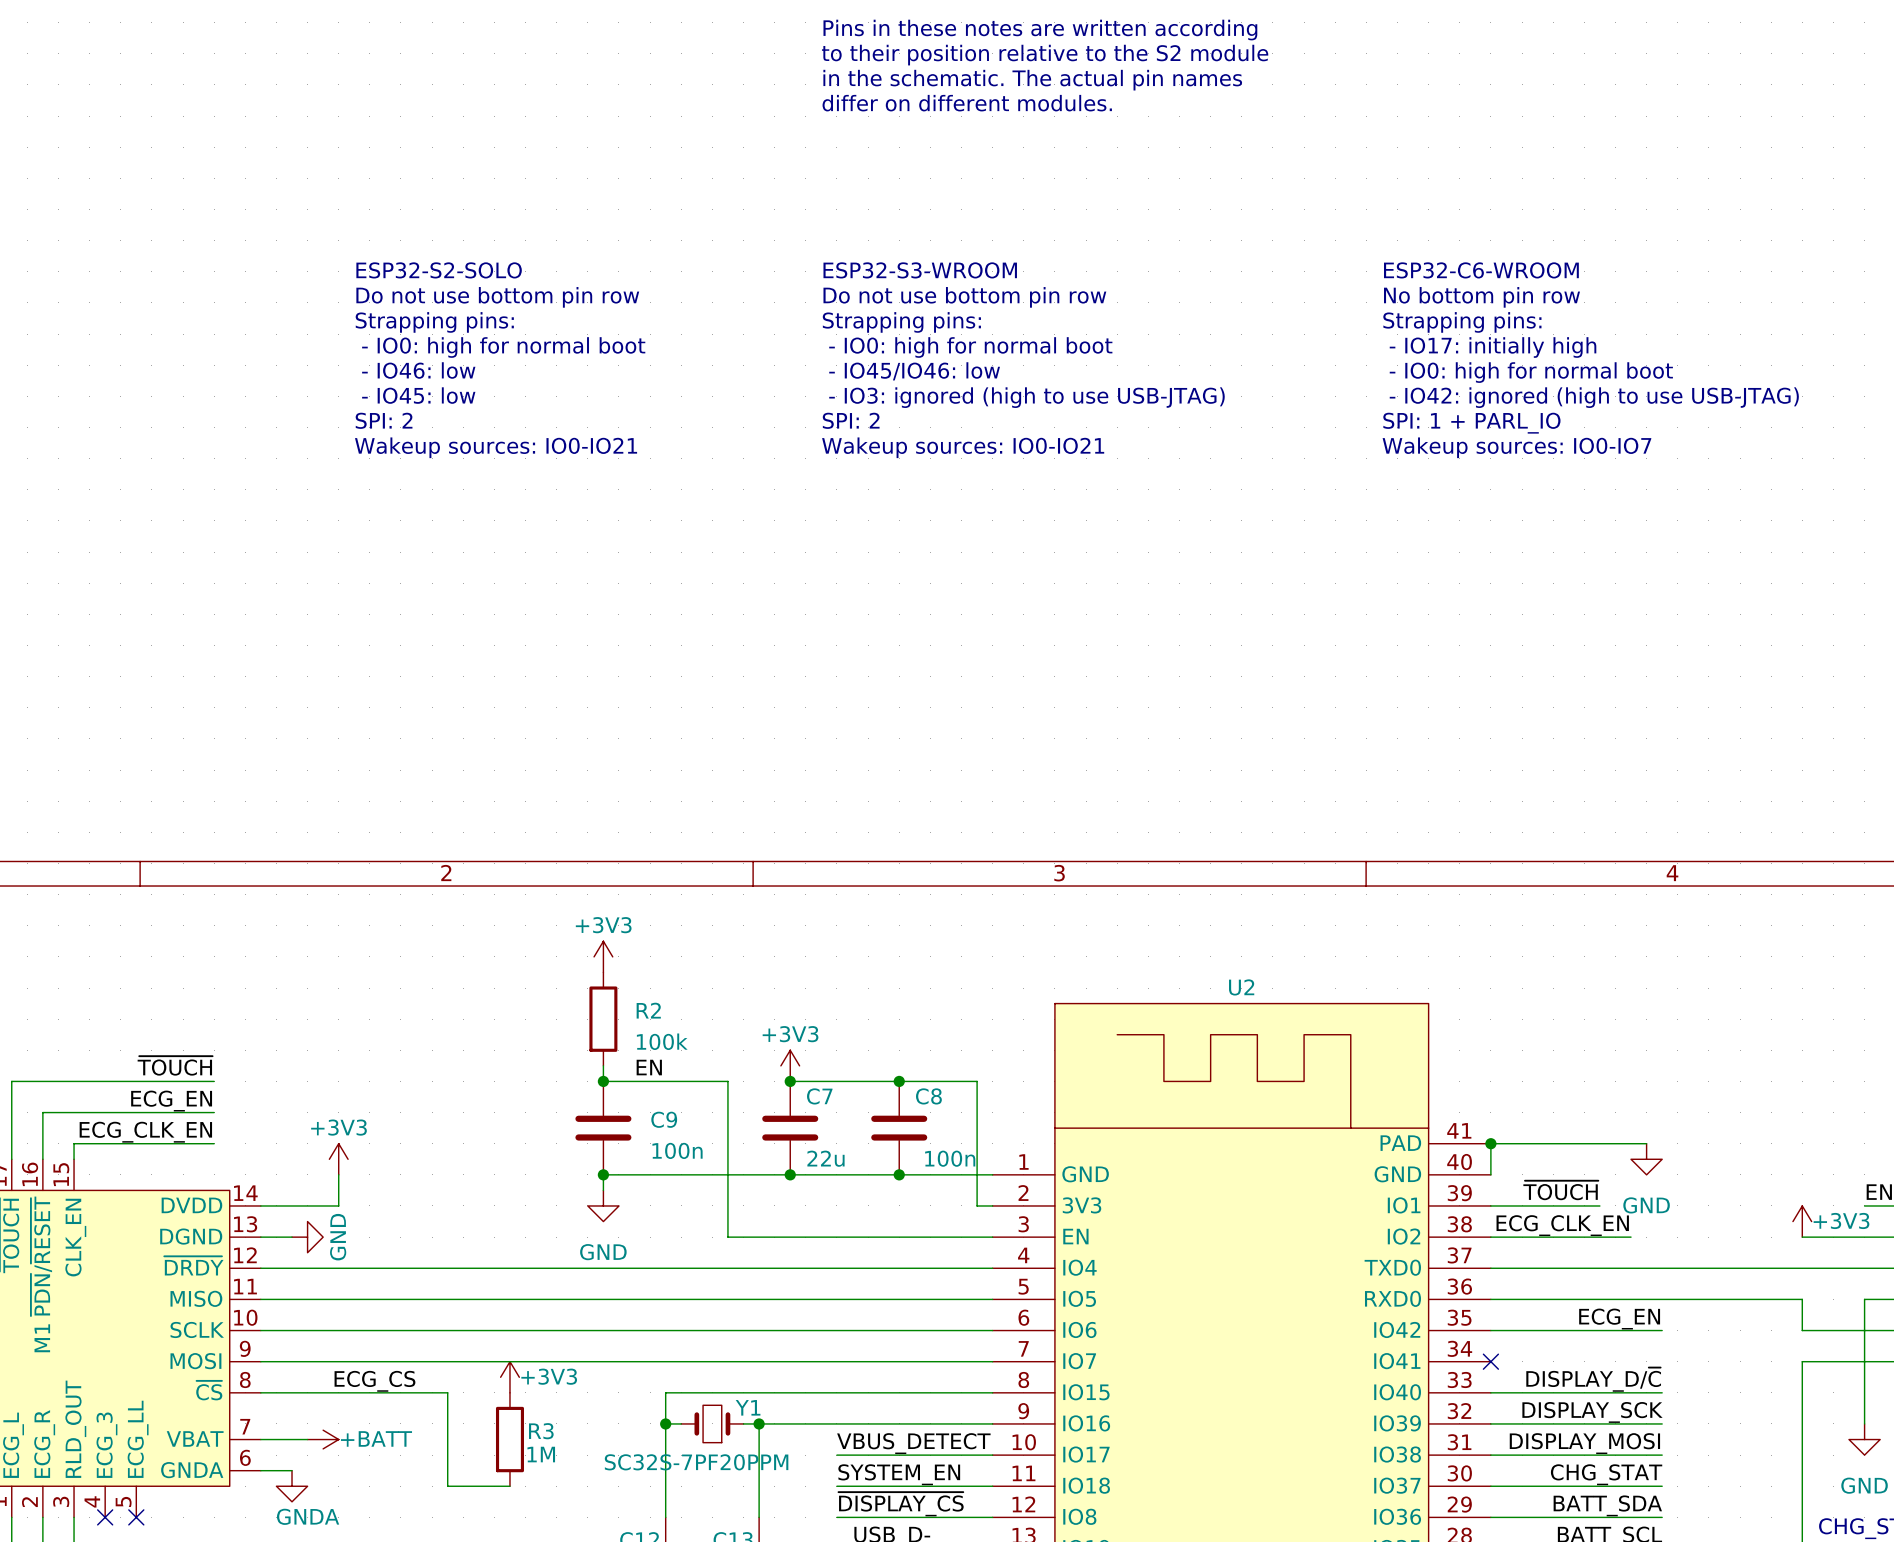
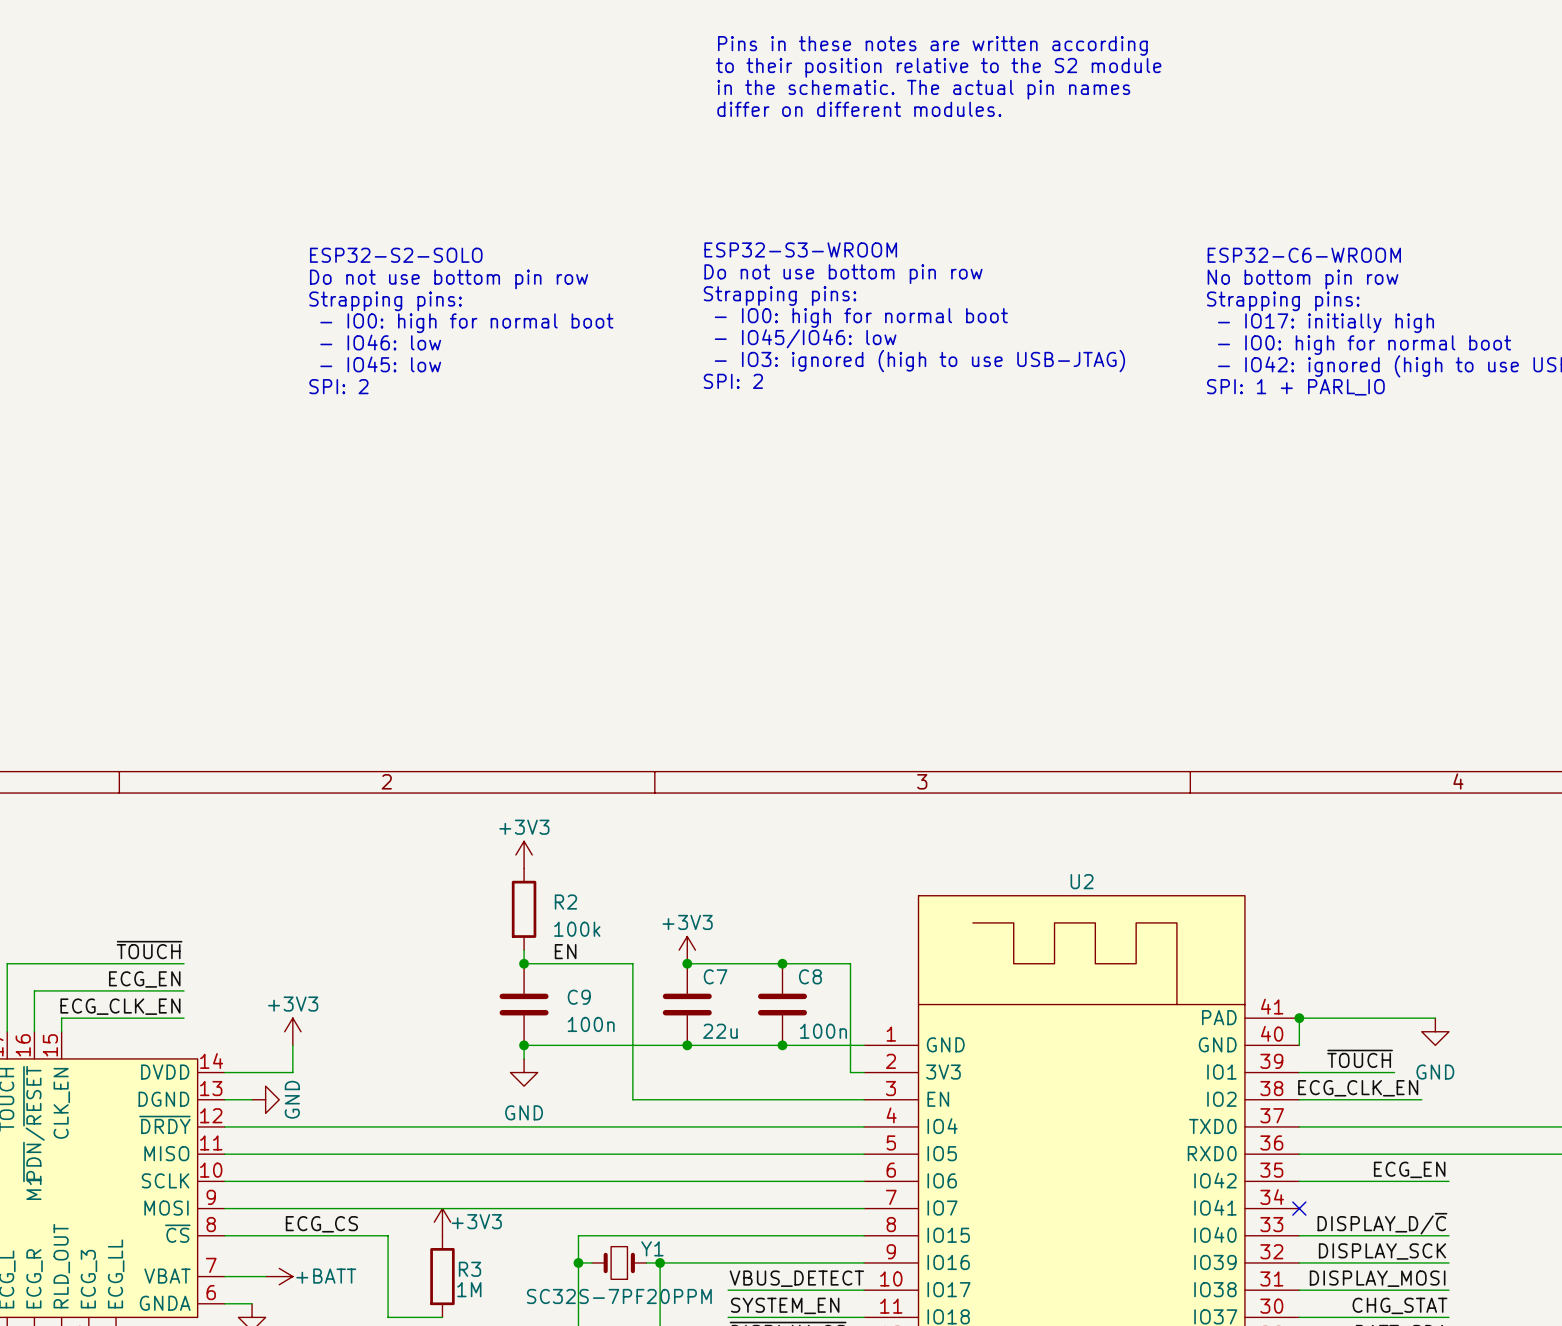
text position: ESP32-S3-WROOM (920, 270) -> ESP32-S3-WROOM (800, 249)
text position: Do not use bottom pin row (964, 297) -> Do not use bottom pin row (843, 274)
text position: Strapping pins: (901, 322) -> Strapping pins: (780, 296)
text position: - IO0: high for normal boot (970, 347) -> - IO0: high for normal boot (861, 317)
text position: - IO45/IO46: low (914, 371) -> - IO45/IO46: low (805, 338)
text position: - IO3: ignored (high to use USB-JTAG) (1026, 397) -> - IO3: ignored (high to use USB-JTAG) (919, 361)
text position: SPI: 2 (851, 420) -> SPI: 2 (733, 381)
text: Wakeup sources: IO0-IO21 (496, 447) -> none
text: Wakeup sources: IO0-IO21 (963, 447) -> none
text: Wakeup sources: IO0-IO7 (1516, 447) -> none

